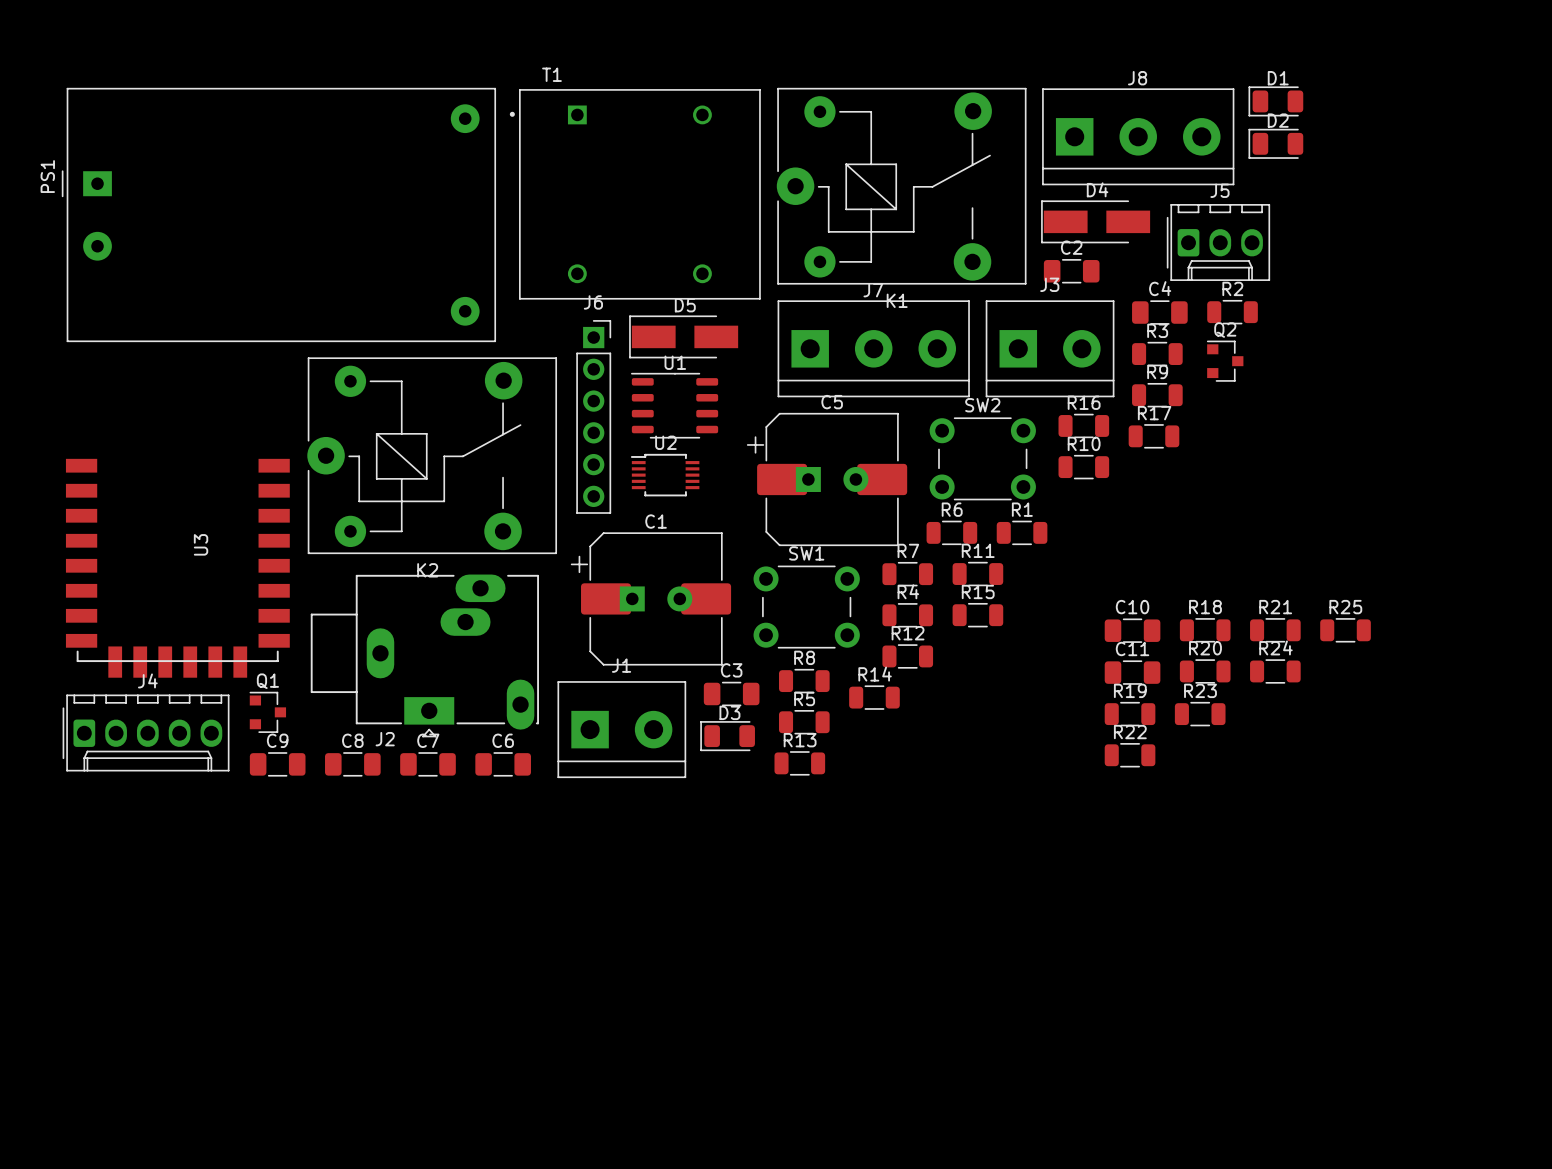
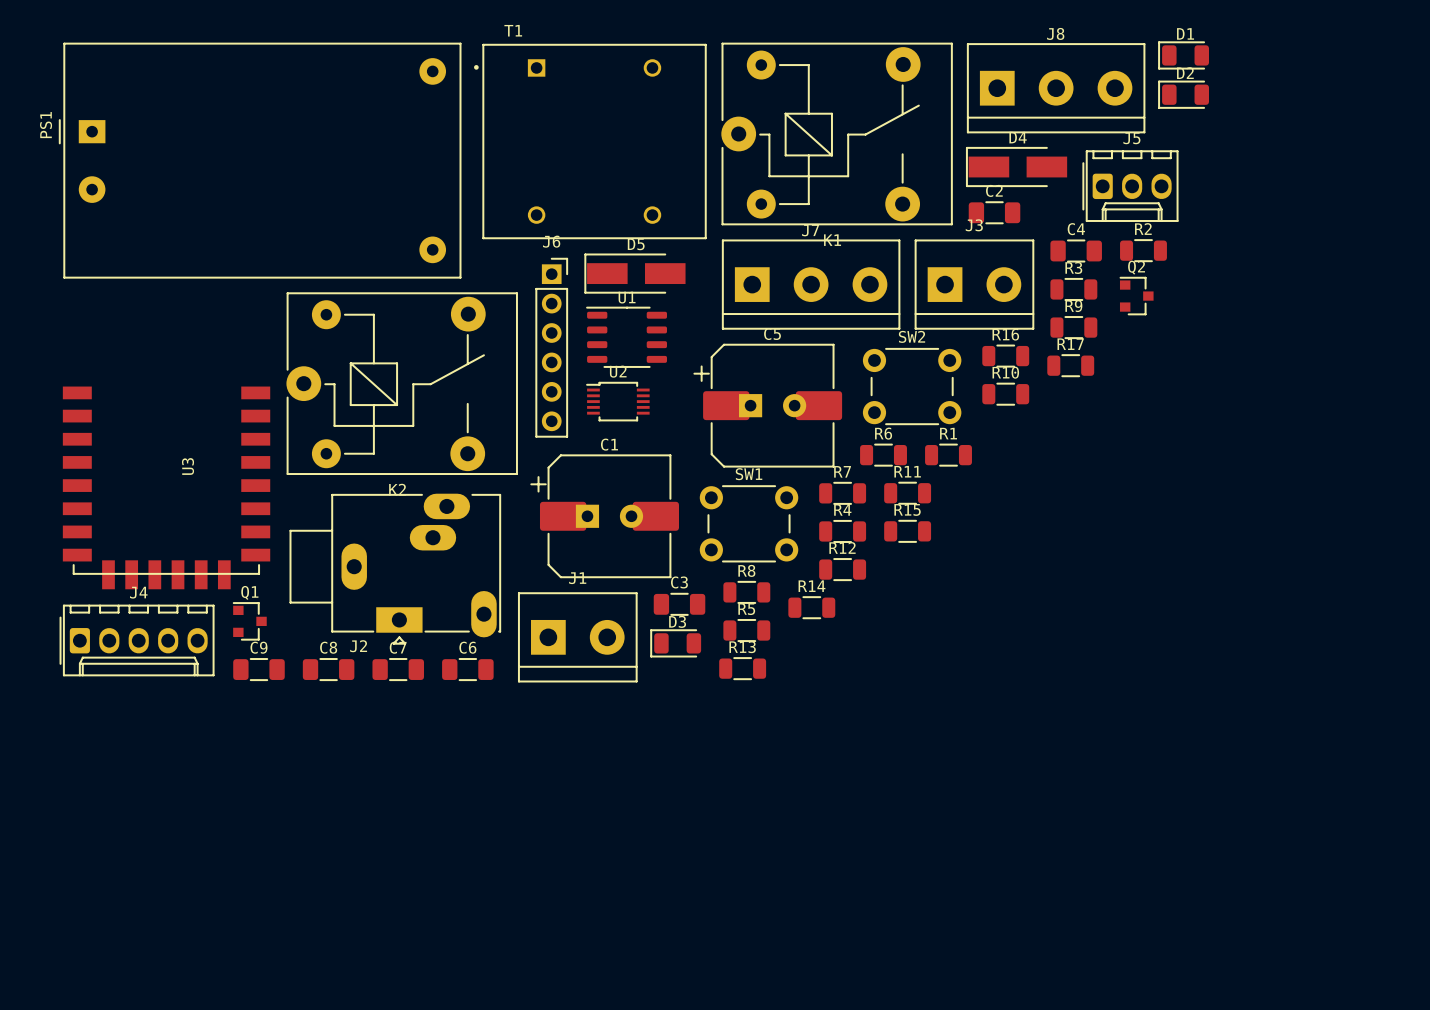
C10: (1132, 630) -> none
R18: (1205, 630) -> none
R21: (1275, 630) -> none
R25: (1345, 630) -> none
R20: (1205, 671) -> none
R24: (1275, 671) -> none
C11: (1132, 672) -> none
R19: (1130, 714) -> none
R23: (1200, 714) -> none
R22: (1130, 755) -> none

